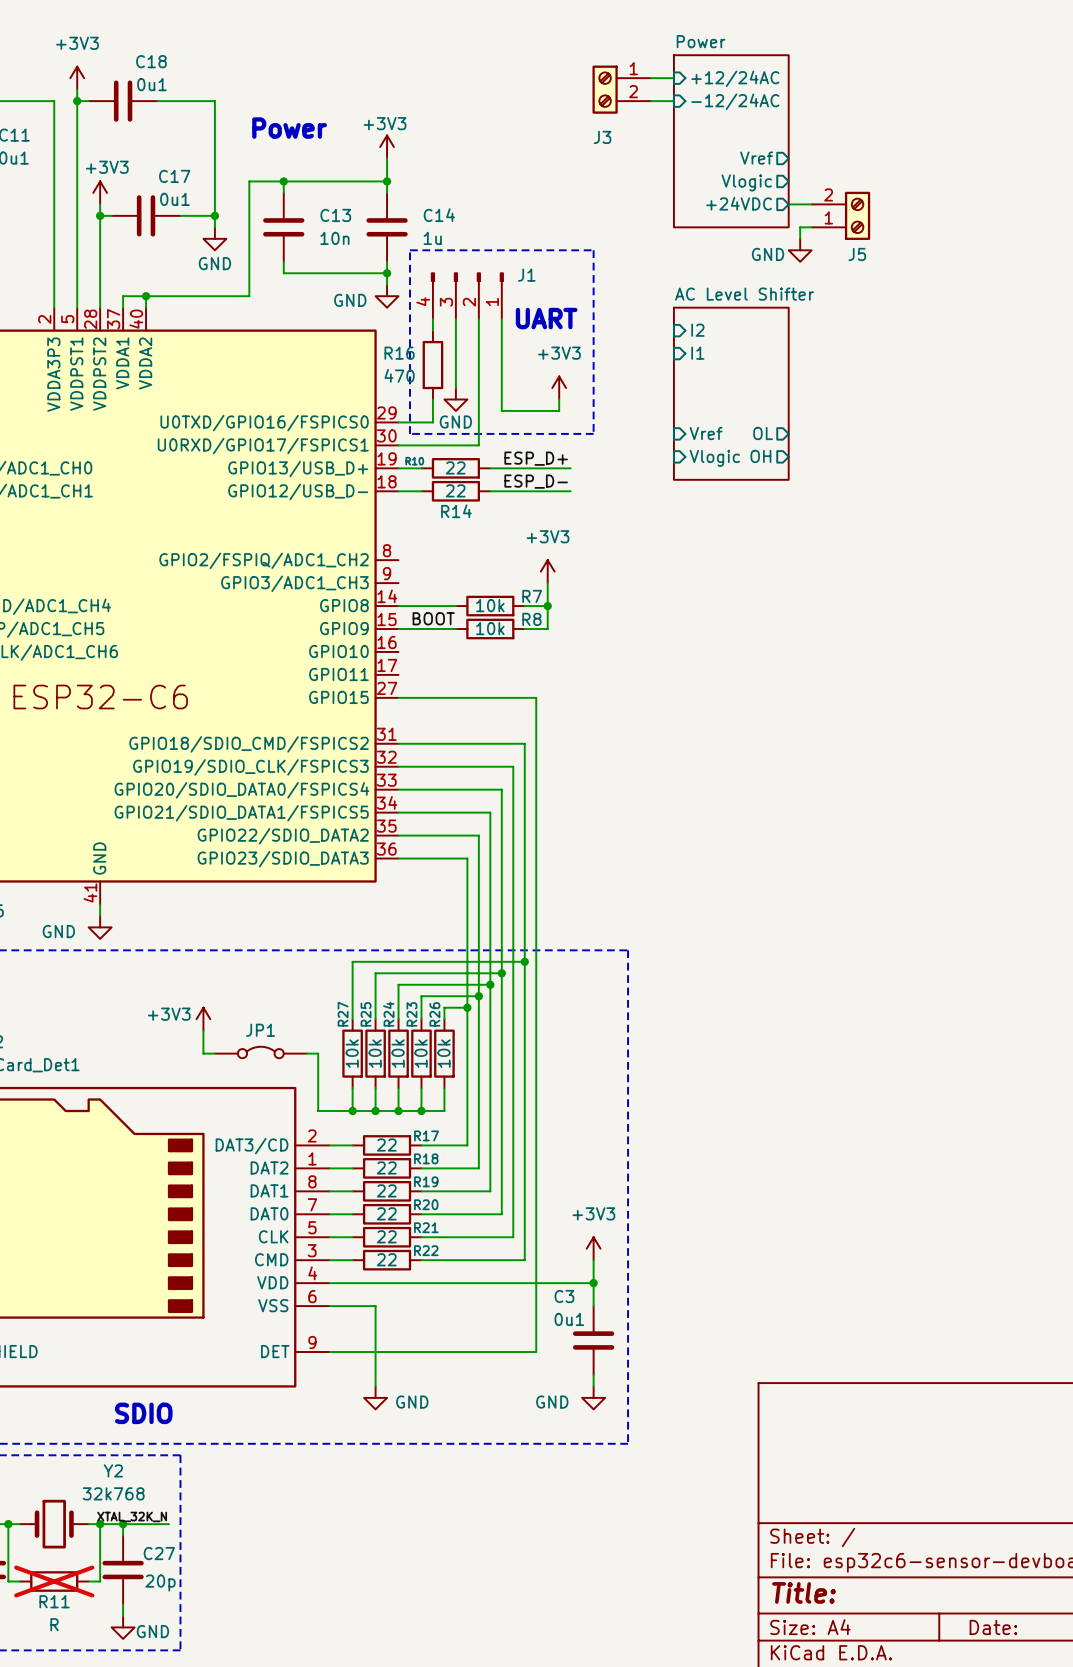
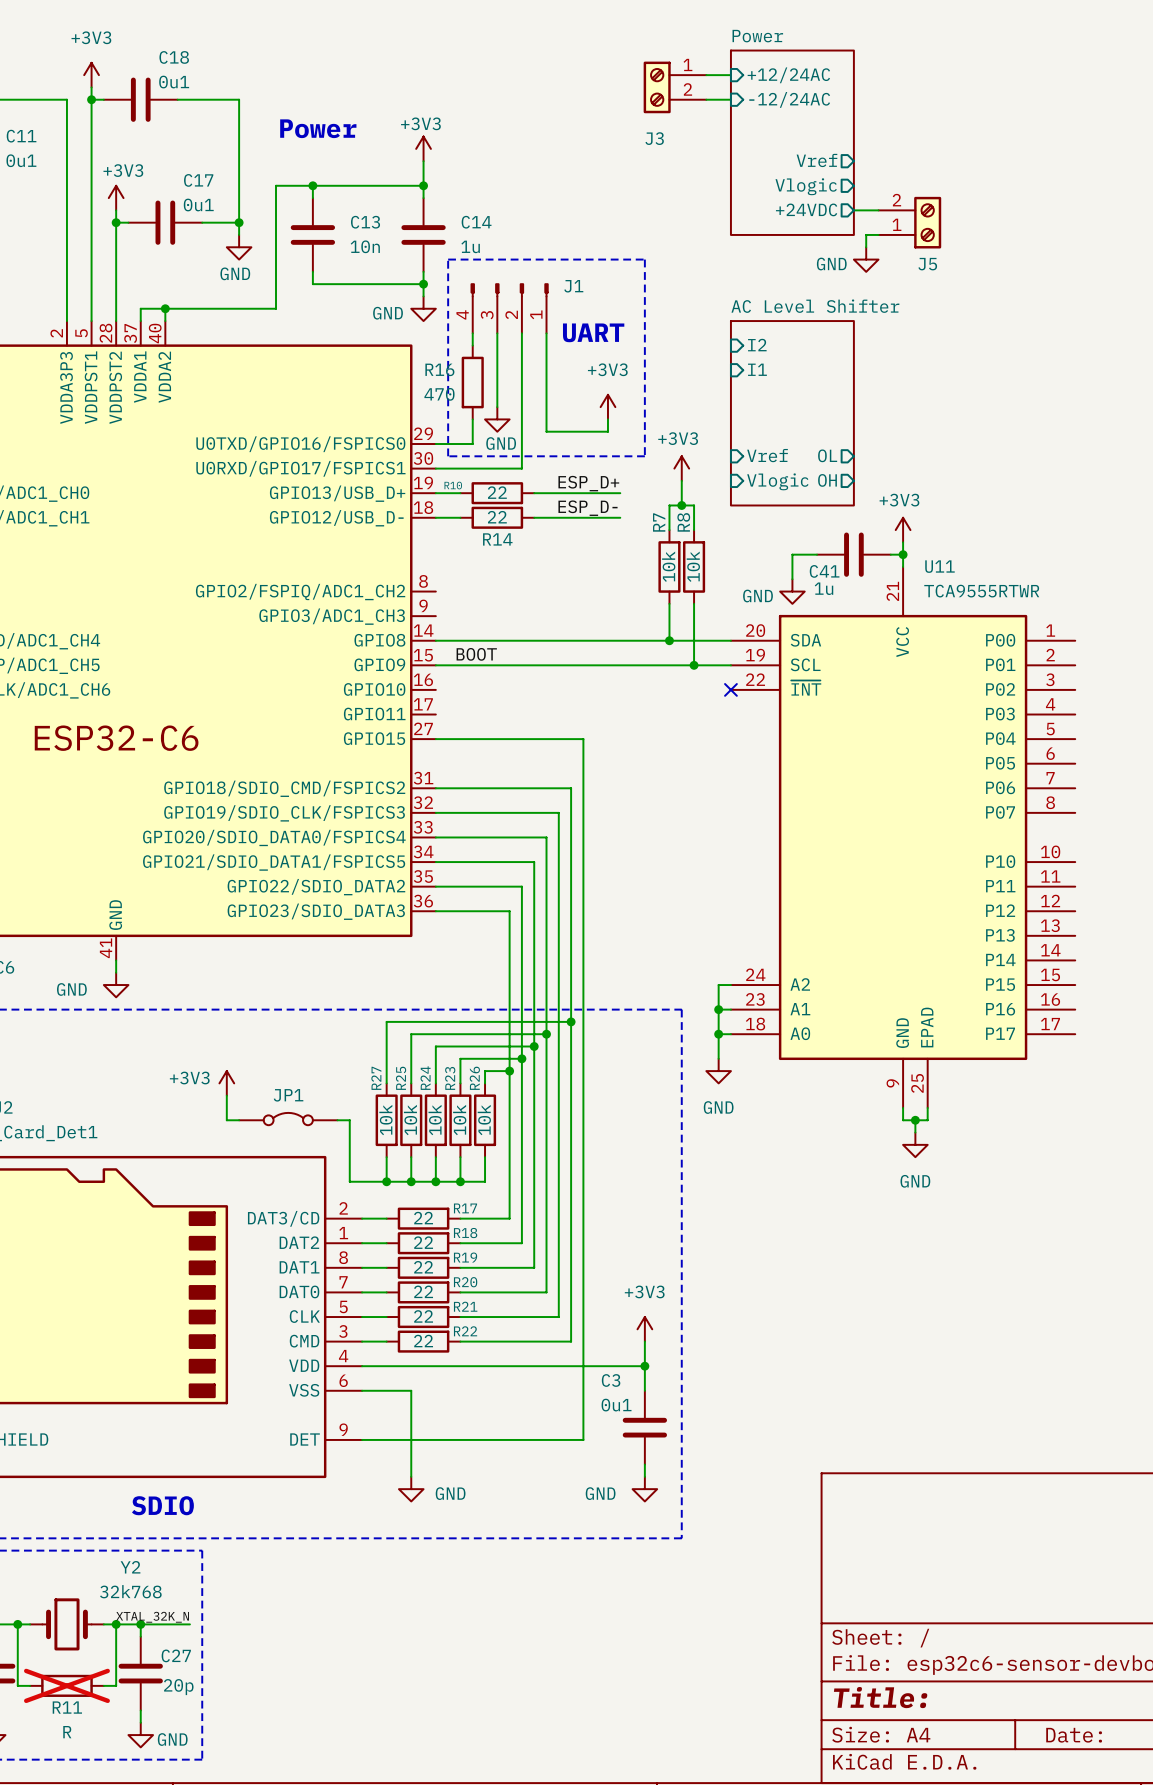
power symbol: none -> +3V3 (681, 468)
wire: none -> (681, 480) (681, 505)
junction: none -> (681, 505)
wire: none -> (669, 530) (669, 505) (694, 505) (694, 530)
power symbol: none -> +3V3 (903, 530)
wire: none -> (903, 542) (903, 566)
wire: none -> (817, 554) (792, 554) (792, 579)
C41: none -> 1u (853, 554)
wire: none -> (890, 554) (903, 554)
junction: none -> (903, 554)
power symbol: none -> GND (792, 591)
power symbol: +3V3 (547, 571) -> none
wire: none -> (669, 603) (669, 640)
wire: none -> (694, 603) (694, 665)
wire: (547, 583) (547, 629) -> (730, 665) (595, 665)
R7 name position: R7 (532, 596) -> R7 (659, 522)
wire: none -> (497, 640) (571, 640)
R7 rotation: 0° (490, 606) -> 90° clockwise (669, 566)
R7 position: (490, 606) -> (669, 566)
wire: none -> (595, 640) (730, 640)
junction: (547, 606) -> none
junction: none -> (669, 640)
R8 name position: R8 (531, 619) -> R8 (683, 522)
wire: none -> (497, 665) (571, 665)
R8 rotation: 0° (490, 629) -> 90° clockwise (694, 566)
R8 position: (490, 629) -> (694, 566)
junction: none -> (694, 665)
no-connect mark: none -> (730, 689)
U11: none -> TCA9555RTWR (903, 837)
wire: none -> (730, 985) (718, 985) (718, 1058)
wire: none -> (718, 1009) (730, 1009)
junction: none -> (718, 1009)
wire: none -> (718, 1034) (730, 1034)
junction: none -> (718, 1034)
power symbol: none -> GND (718, 1071)
wire: none -> (903, 1107) (903, 1120) (927, 1120) (927, 1107)
wire: none -> (915, 1120) (915, 1132)
junction: none -> (915, 1120)
power symbol: none -> GND (915, 1144)

